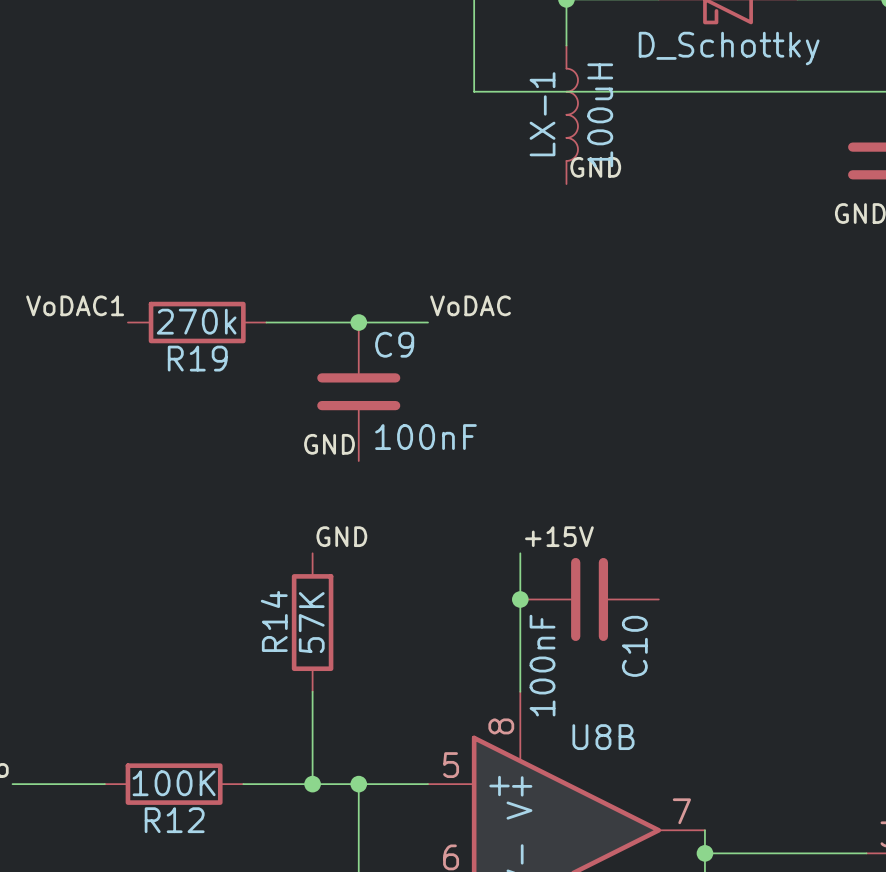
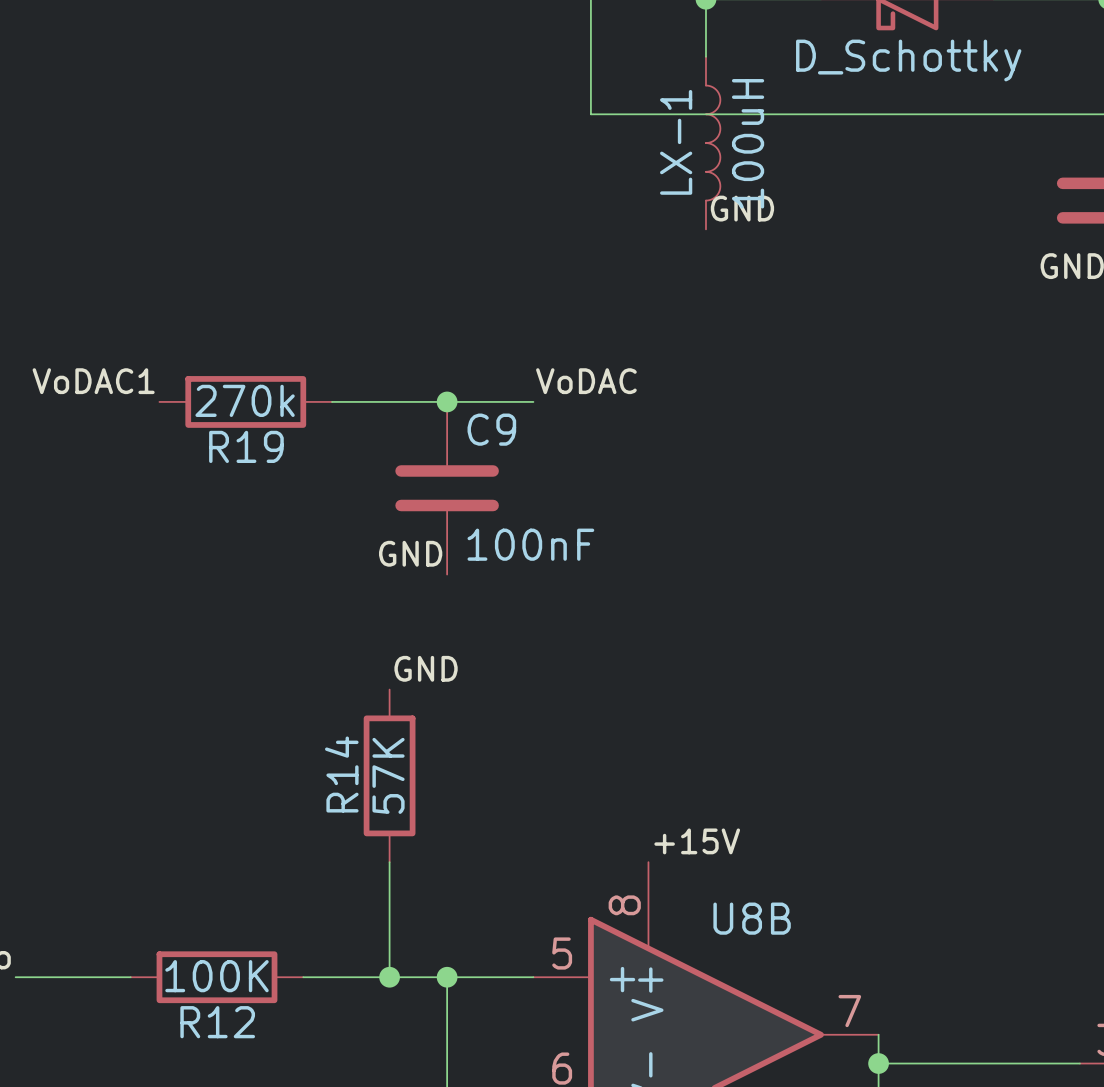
label position: +15V (559, 536) -> +15V (697, 841)
wire: (520, 553) (520, 691) -> none
junction: (520, 599) -> none
C10: 100nF (589, 599) -> none

